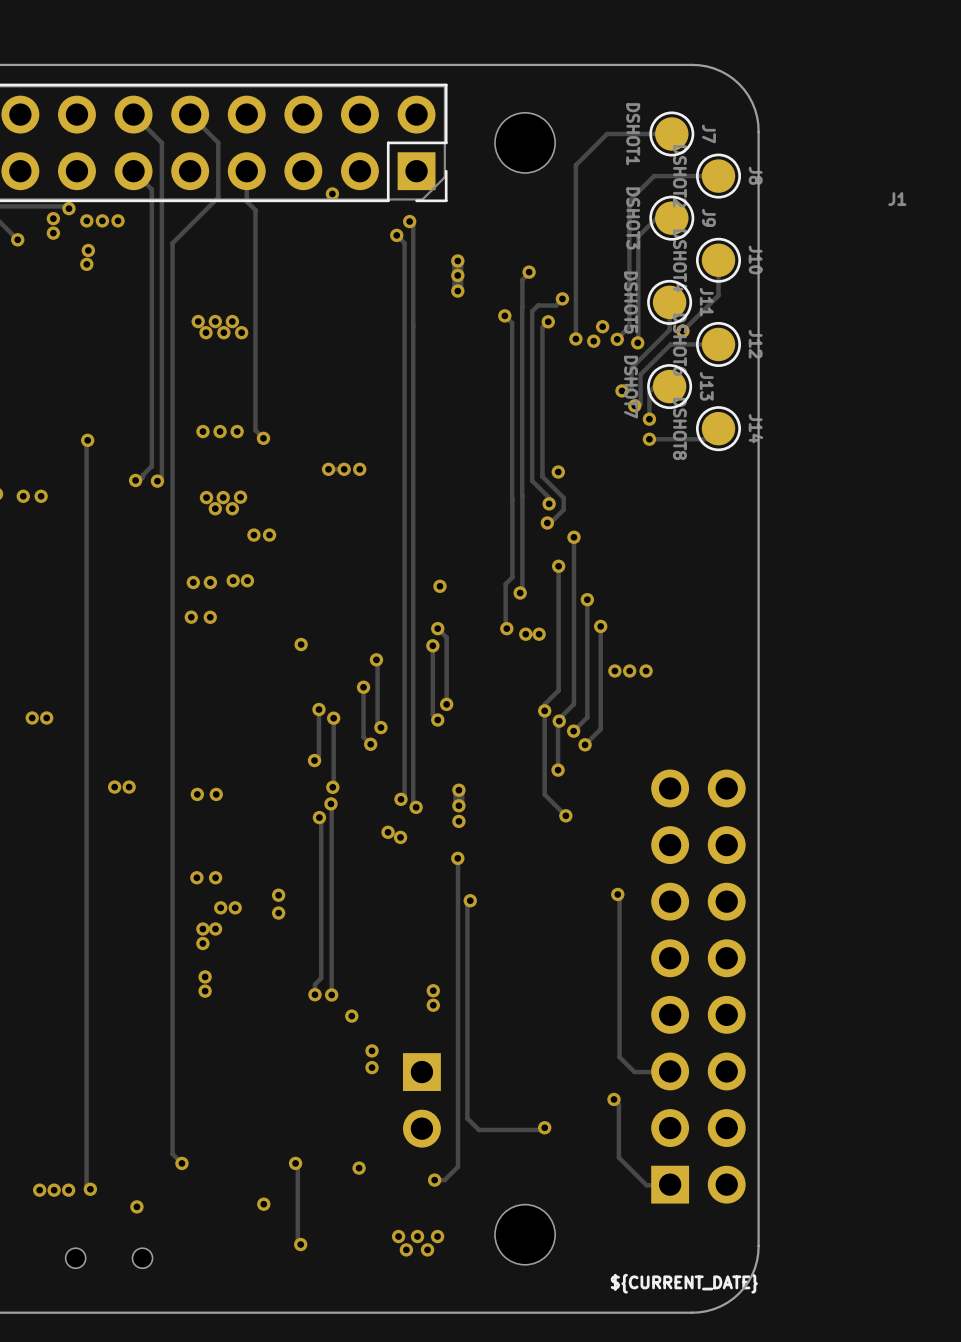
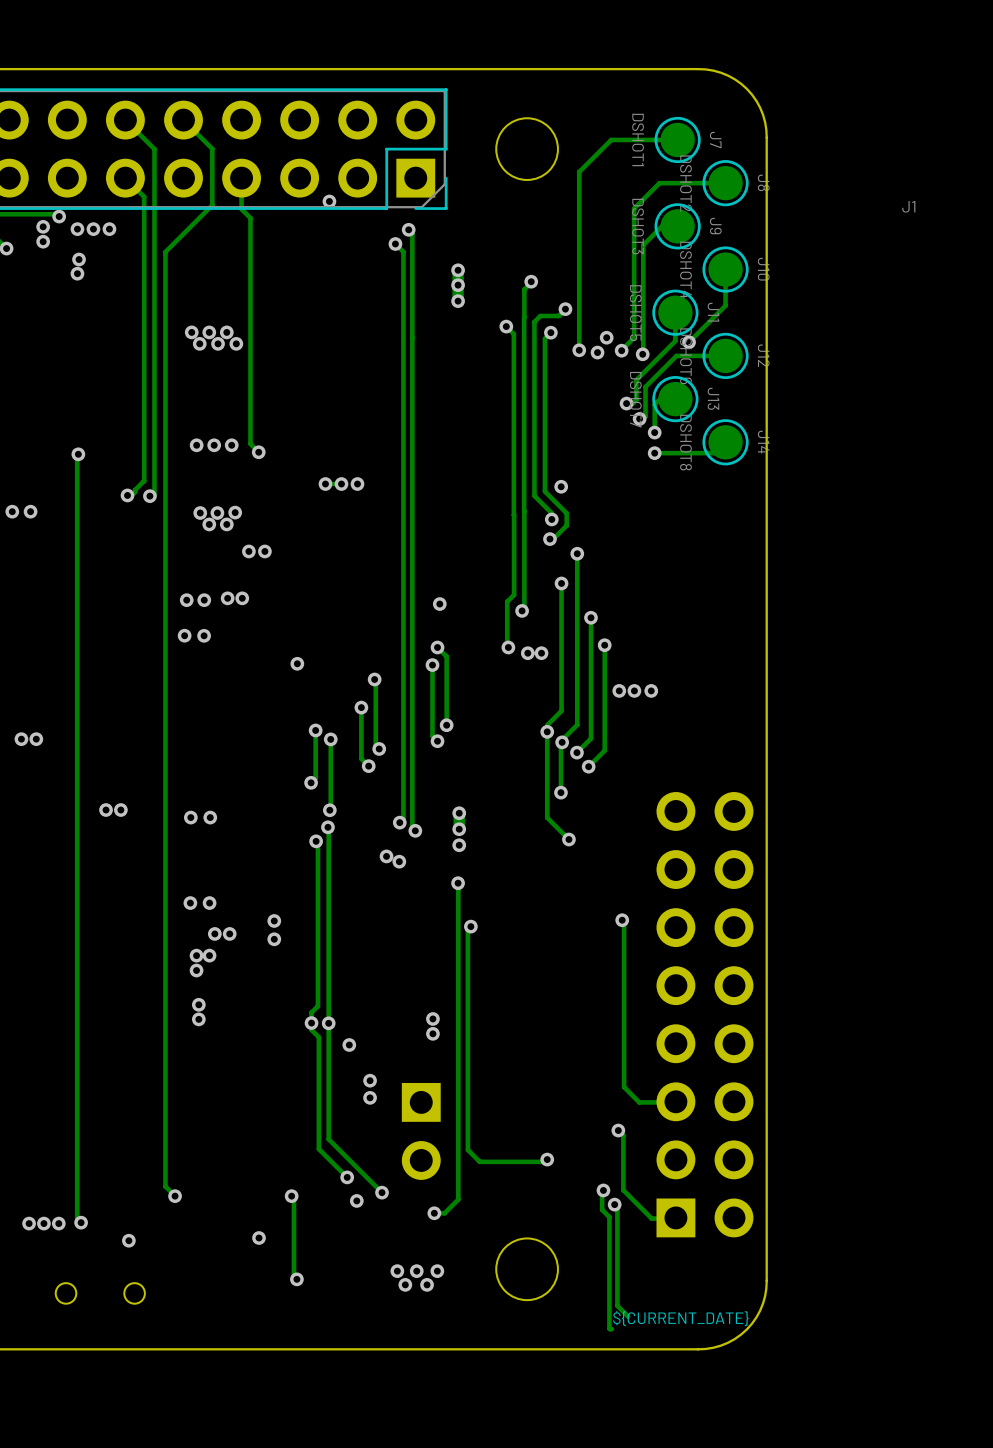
track: none -> (311, 1023) (311, 1029) (318, 1037) (318, 1149) (347, 1177)
track: none -> (328, 1023) (328, 1139) (382, 1192)
via: none -> (347, 1177)
track: none -> (603, 1190) (602, 1209) (609, 1217) (609, 1328) (611, 1329)
via: none -> (603, 1190)
via: none -> (382, 1192)
track: none -> (614, 1204) (617, 1207) (617, 1305) (627, 1316)
via: none -> (614, 1204)

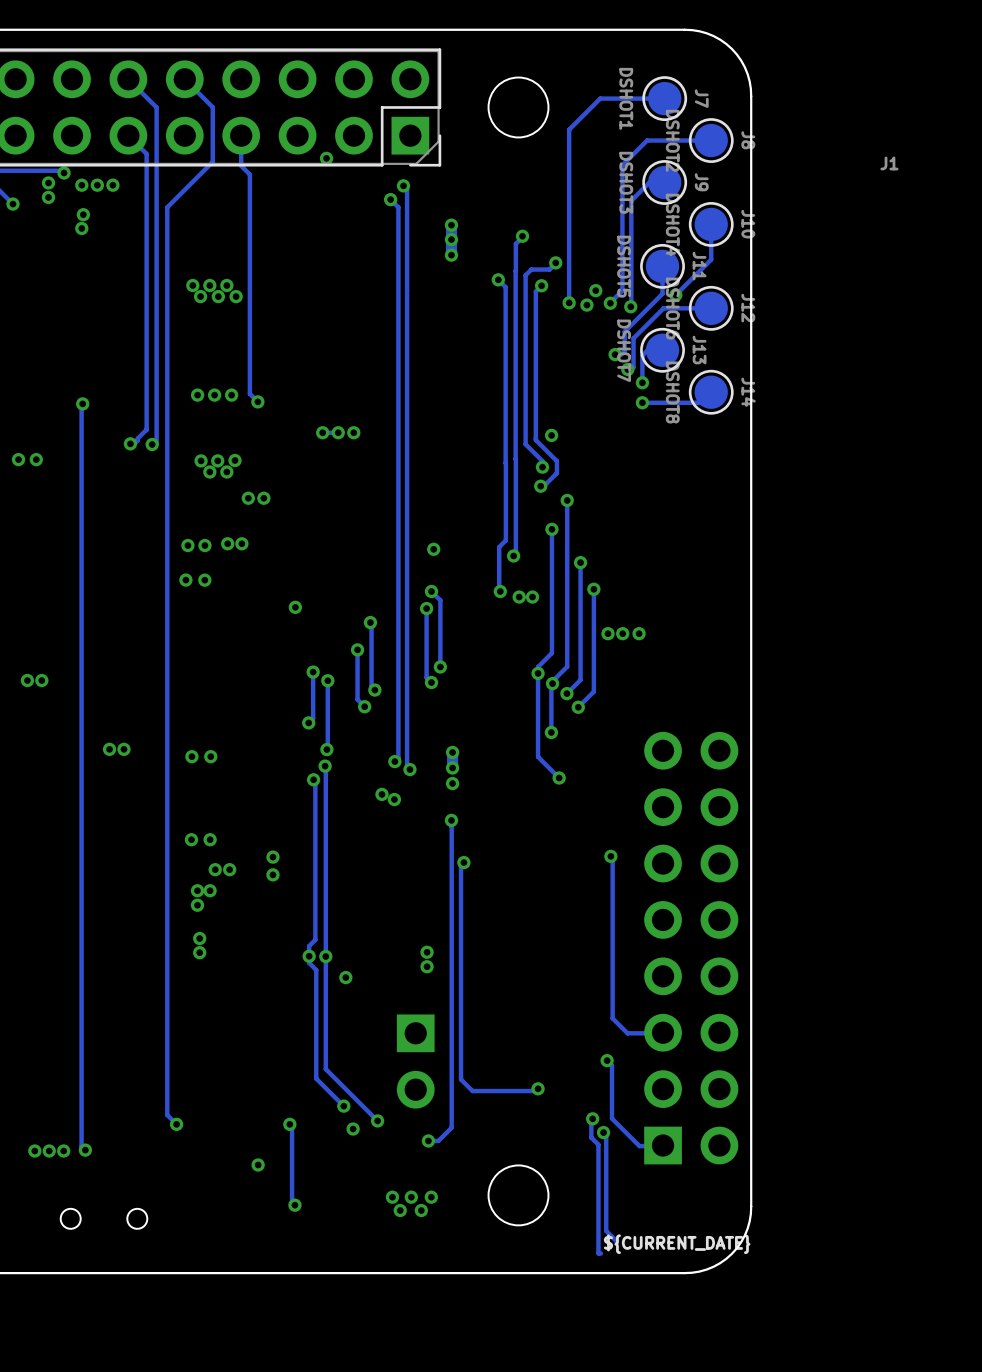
via: (370, 1080) -> none
via: (370, 1097) -> none
via: (128, 1240) -> none

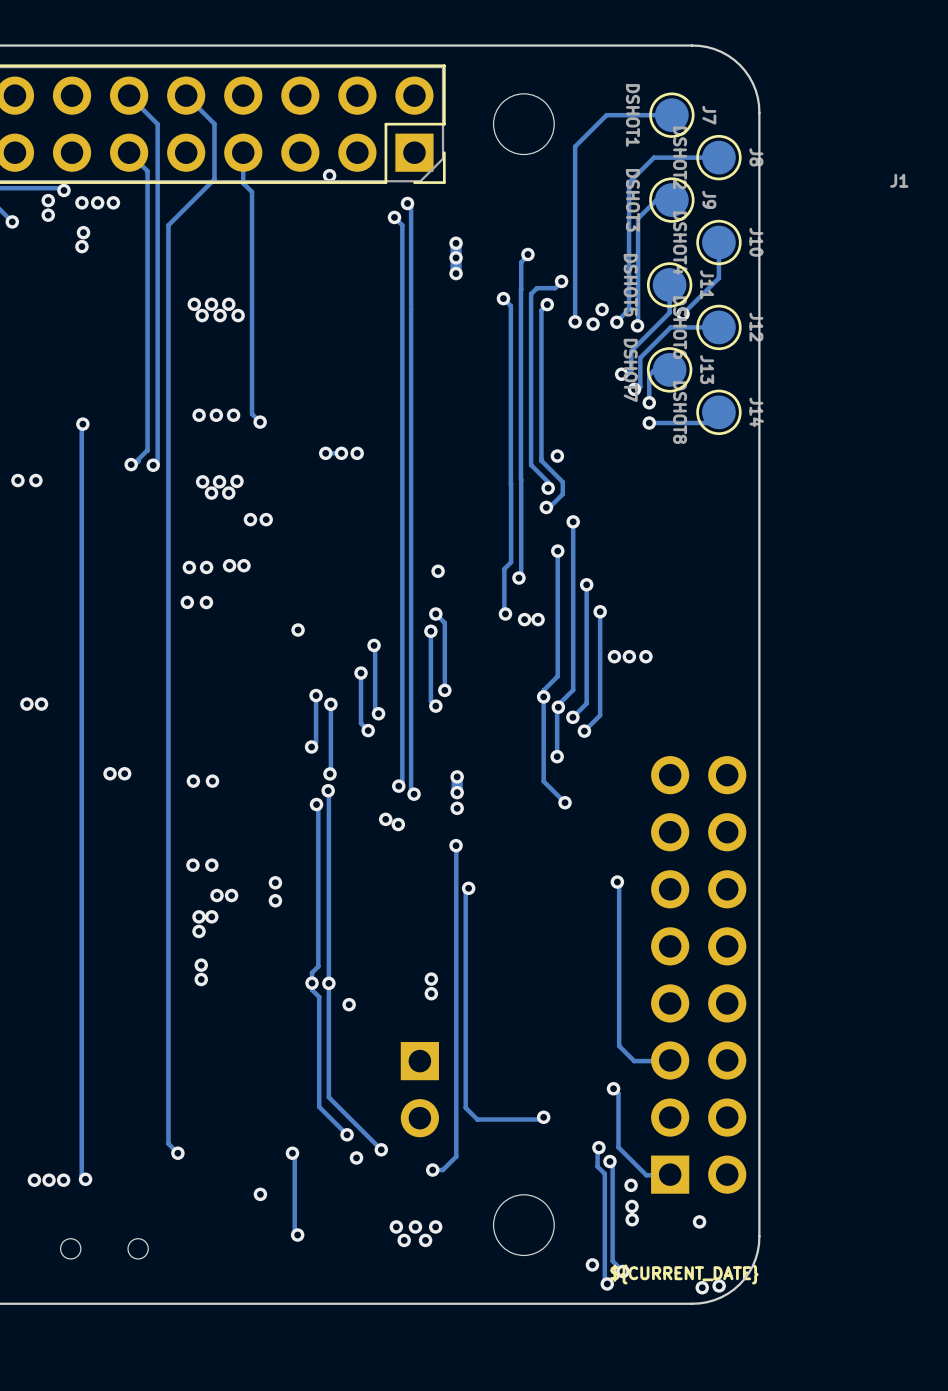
via: none -> (631, 1185)
via: none -> (631, 1206)
via: none -> (632, 1219)
via: none -> (699, 1221)
via: none -> (592, 1264)
via: none -> (622, 1271)
via: none -> (607, 1283)
via: none -> (719, 1285)
via: none -> (702, 1287)

